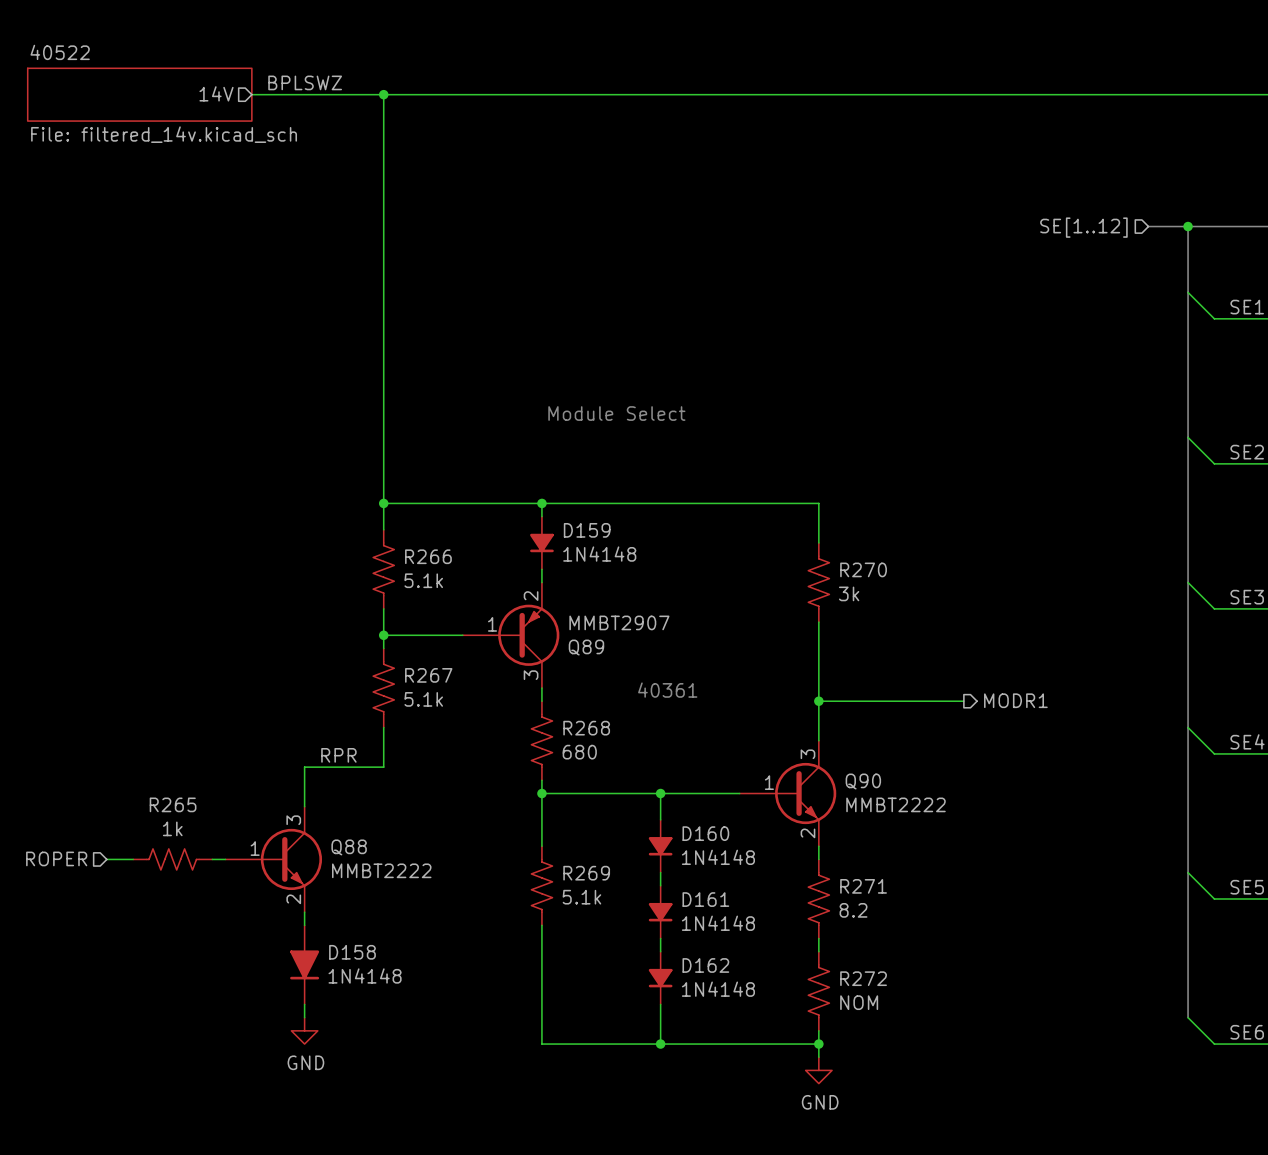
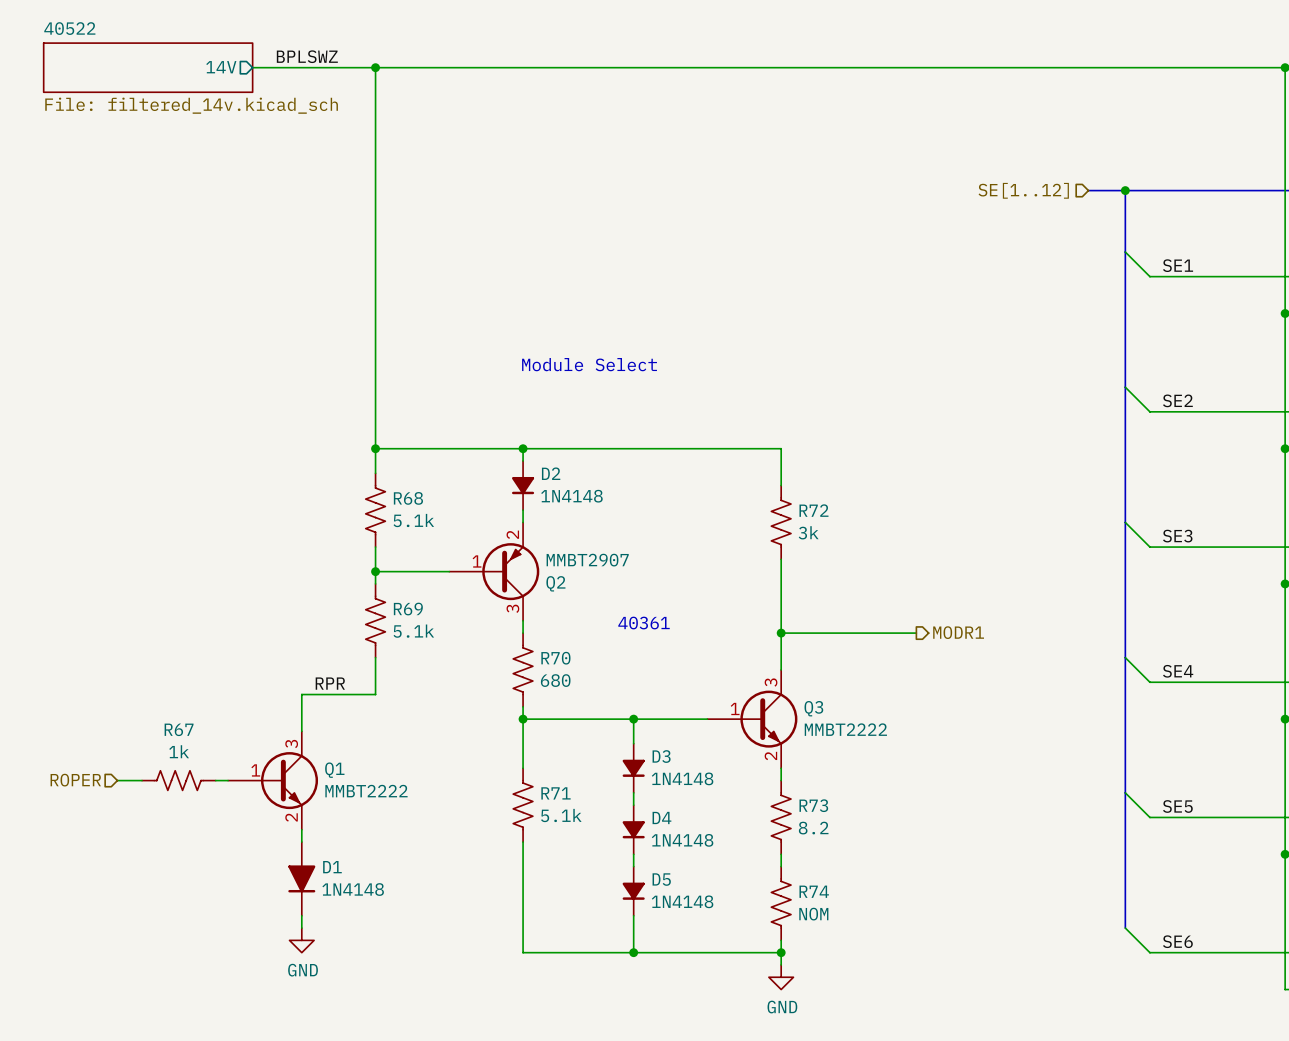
D159 name: D159 (587, 530) -> D2 (551, 473)
R266 name: R266 (428, 556) -> R68 (408, 498)
R270 name: R270 (863, 569) -> R72 (813, 510)
Q89 name: Q89 (586, 647) -> Q2 (555, 583)
R267 name: R267 (428, 675) -> R69 (408, 609)
R268 name: R268 (586, 728) -> R70 (555, 658)
Q90 name: Q90 (863, 781) -> Q3 (813, 708)
R265 name: R265 (173, 804) -> R67 (179, 729)
D160 name: D160 (705, 833) -> D3 (661, 756)
Q88 name: Q88 (349, 847) -> Q1 (334, 770)
R269 name: R269 (586, 873) -> R71 (555, 793)
R271 name: R271 (863, 886) -> R73 (813, 805)
D161 name: D161 (705, 899) -> D4 (661, 817)
D158 name: D158 (352, 952) -> D1 (332, 867)
D162 name: D162 (705, 965) -> D5 (661, 879)
R272 name: R272 (863, 978) -> R74 (814, 891)

